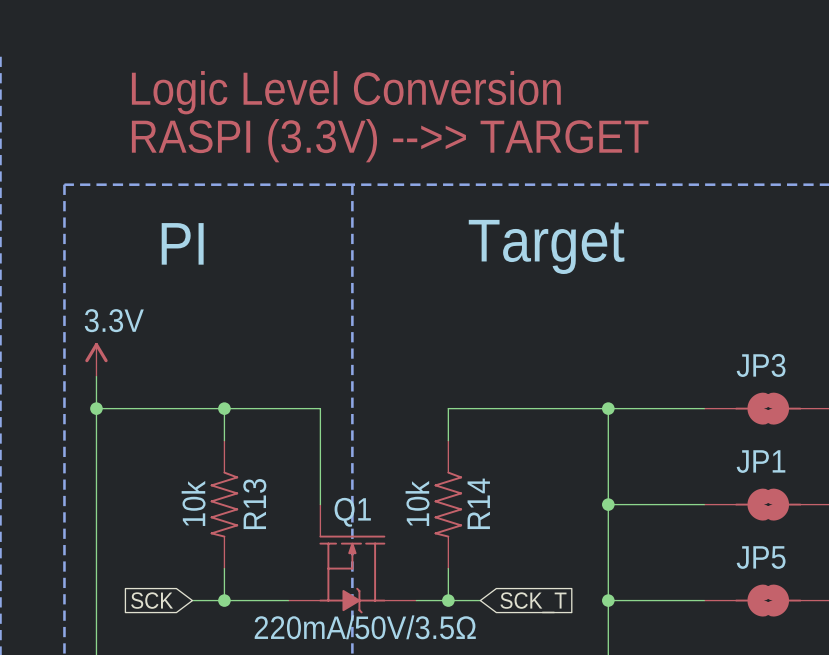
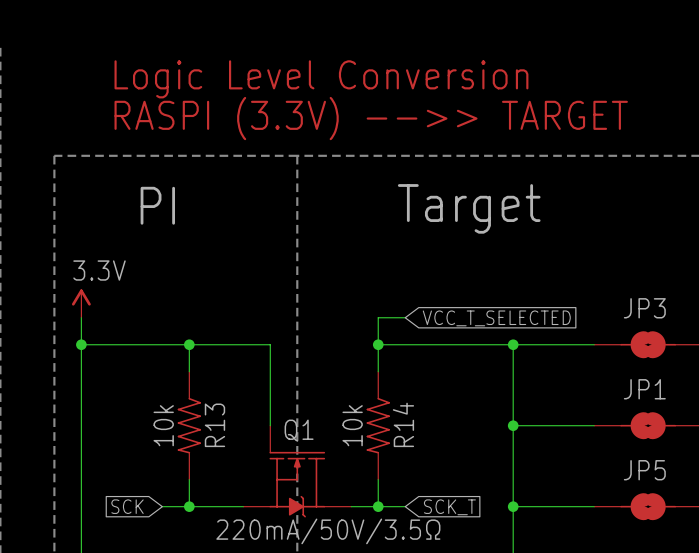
wire: none -> (405, 317) (378, 317) (378, 344)
global label: none -> VCC_T_SELECTED (496, 318)
junction: none -> (378, 344)

